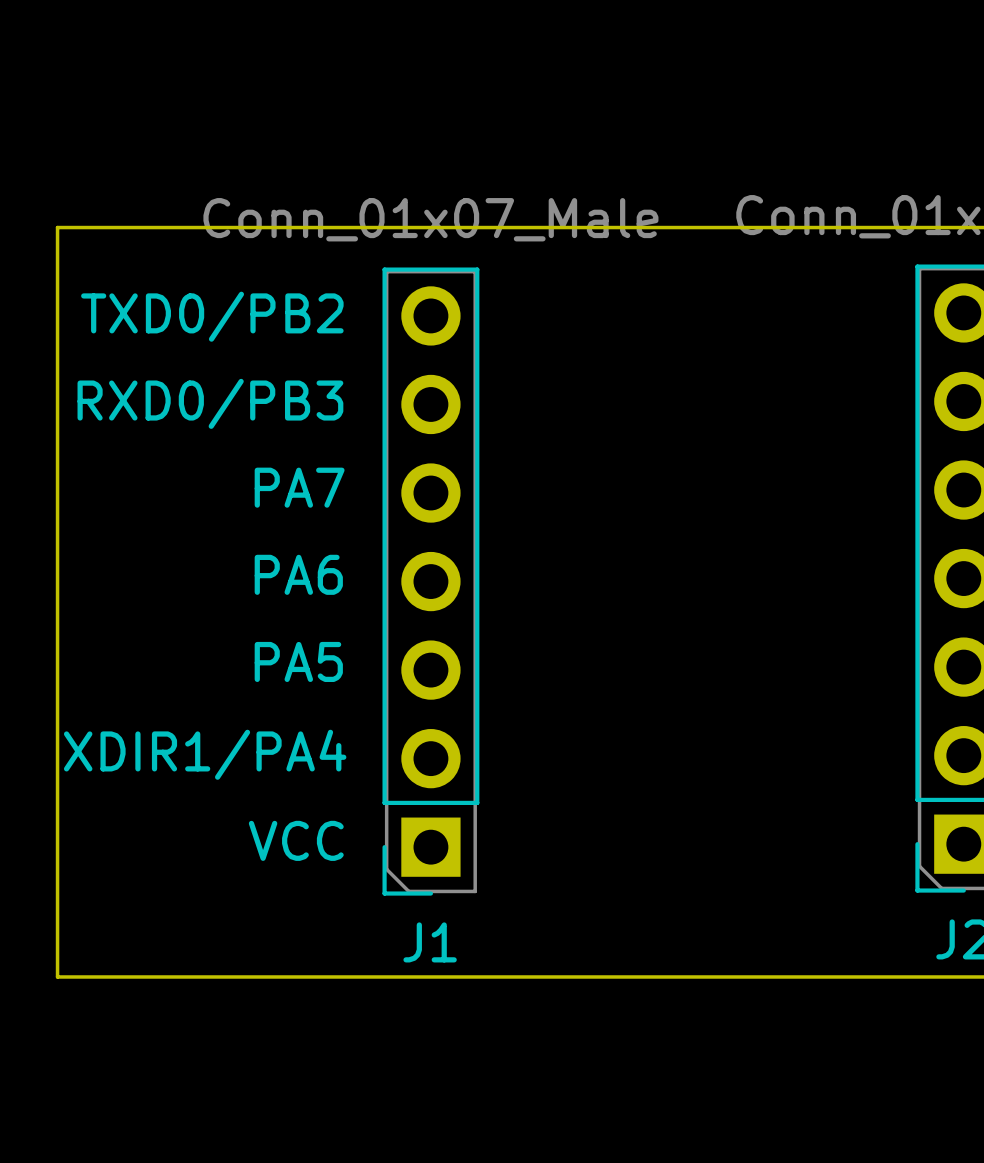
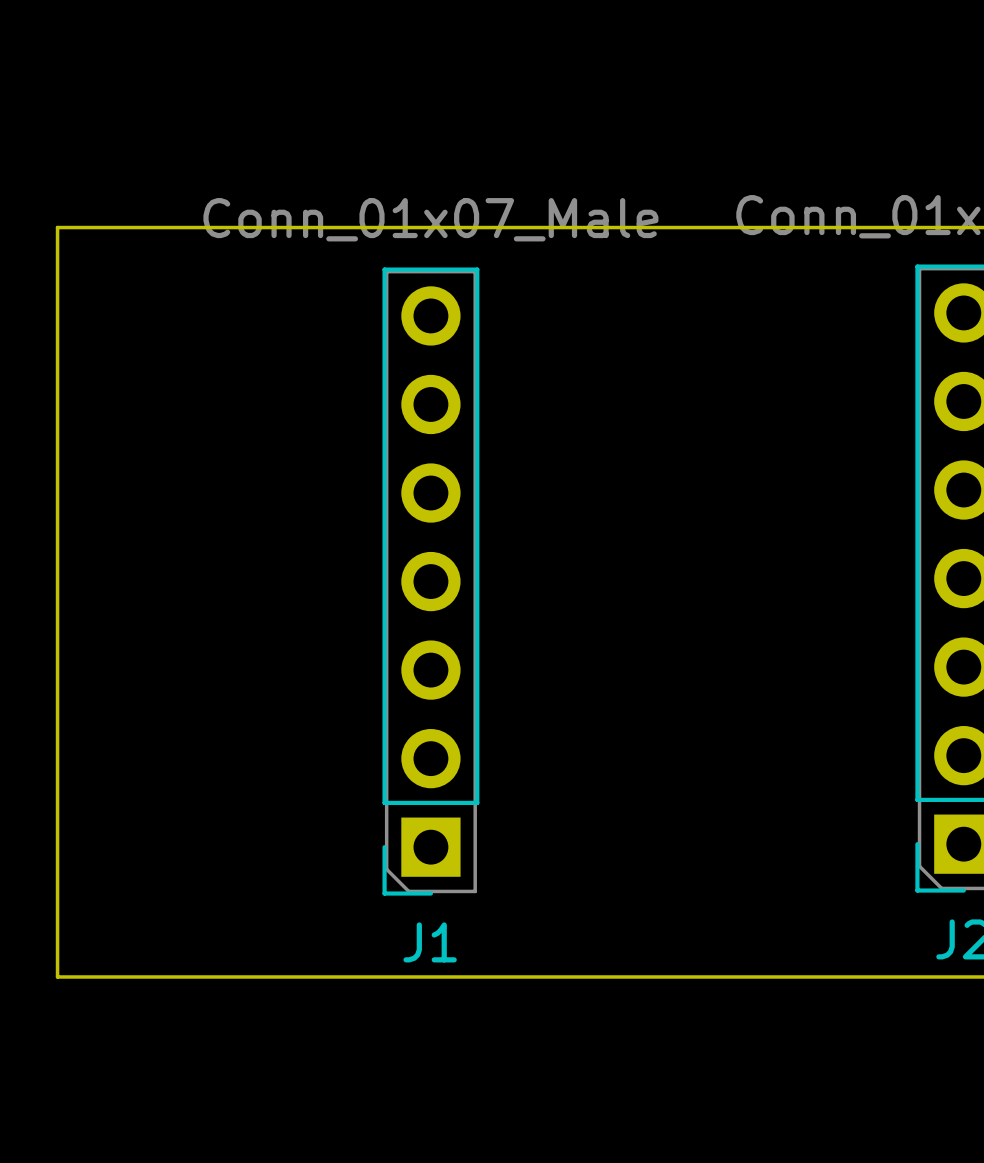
text: TXD0/PB2 (212, 316) -> none
text: RXD0/PB3 (210, 403) -> none
text: PA7 (299, 487) -> none
text: PA6 (298, 574) -> none
text: PA5 (298, 661) -> none
text: XDIR1/PA4 (205, 754) -> none
text: VCC (296, 840) -> none

